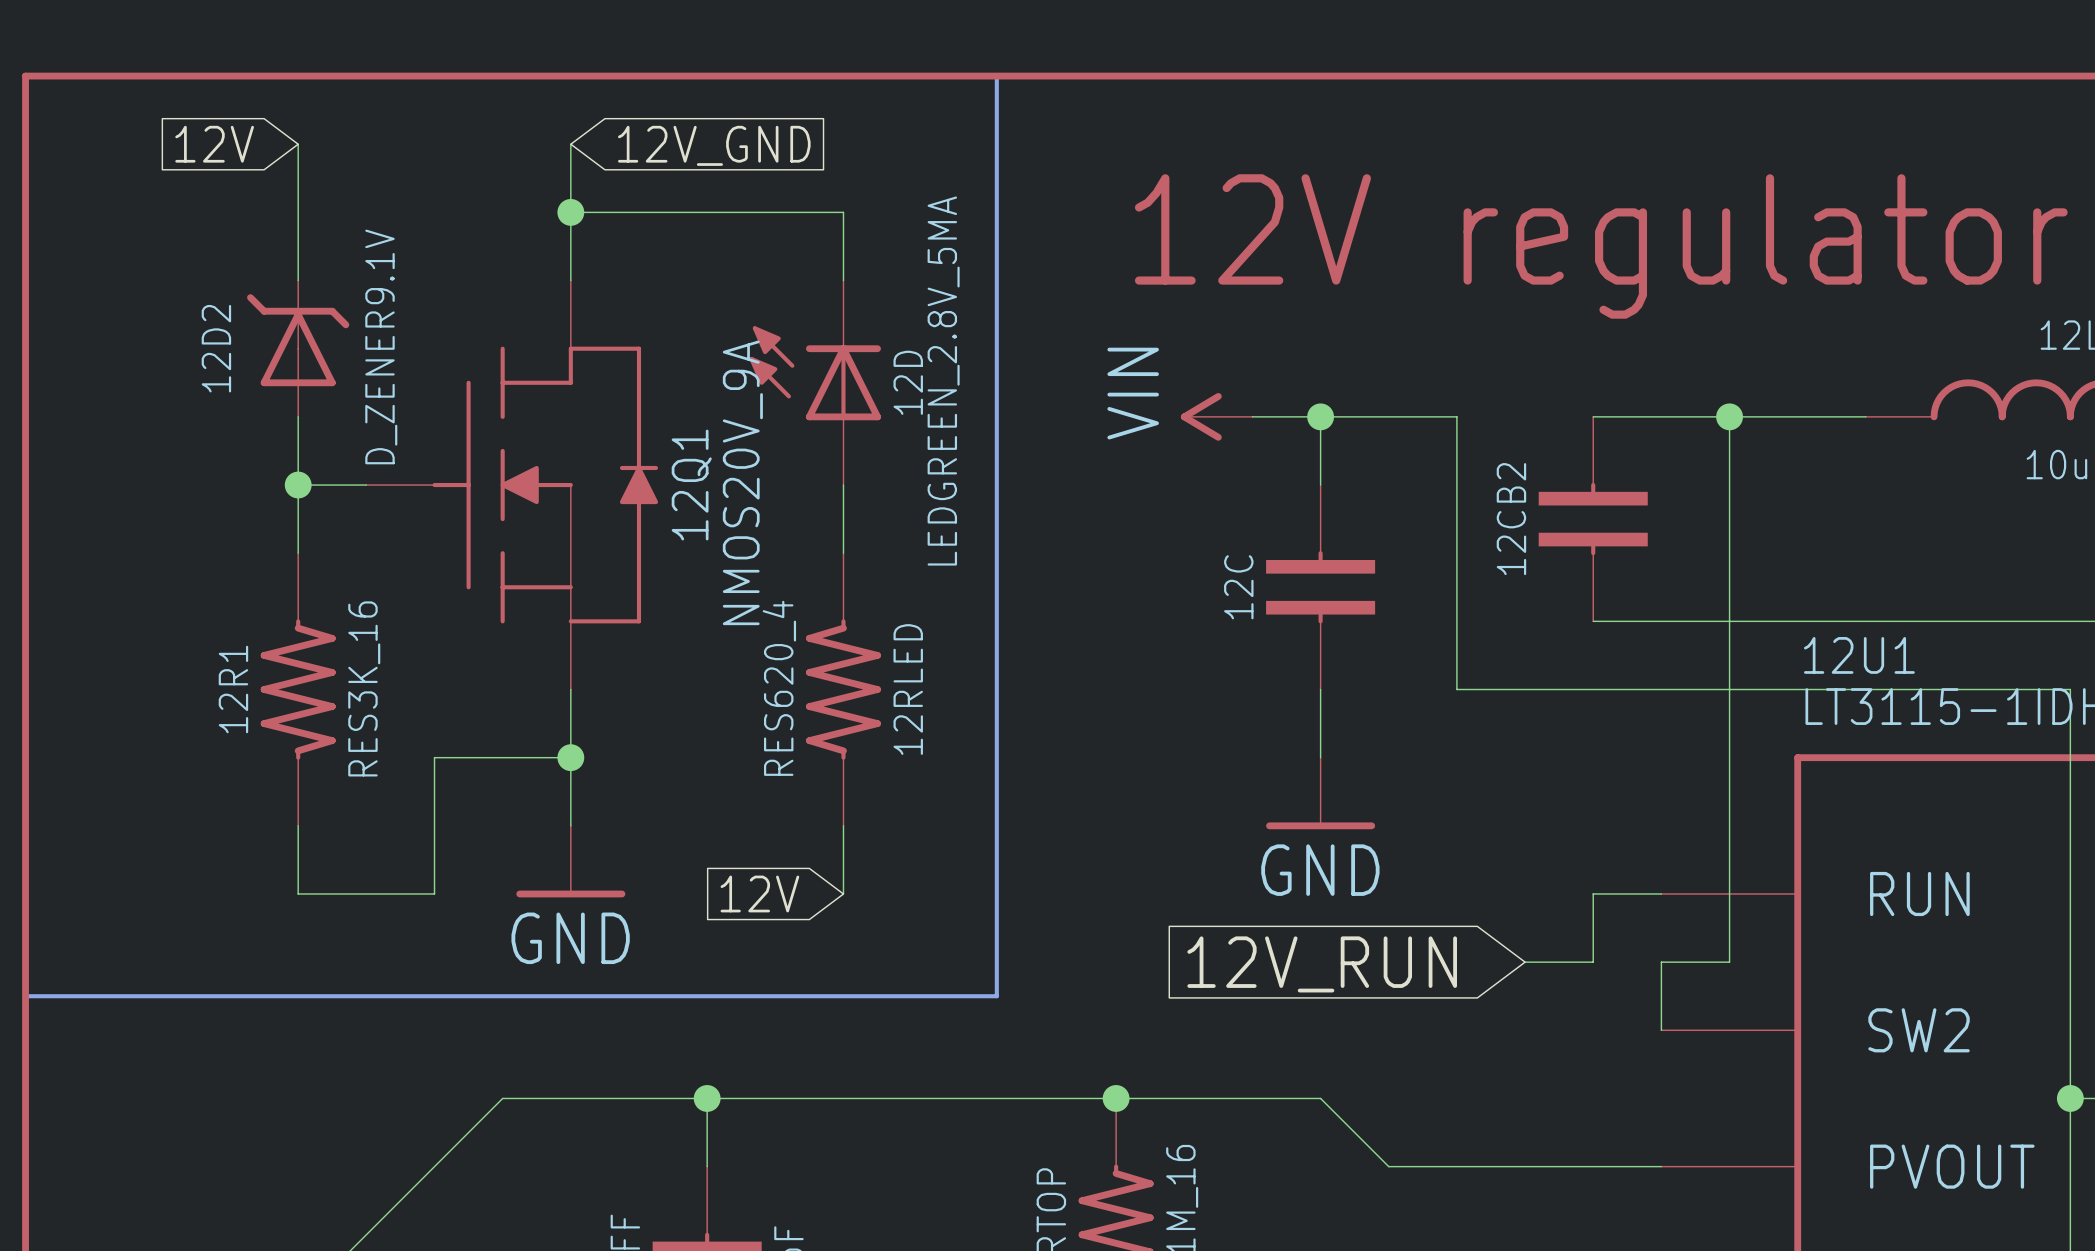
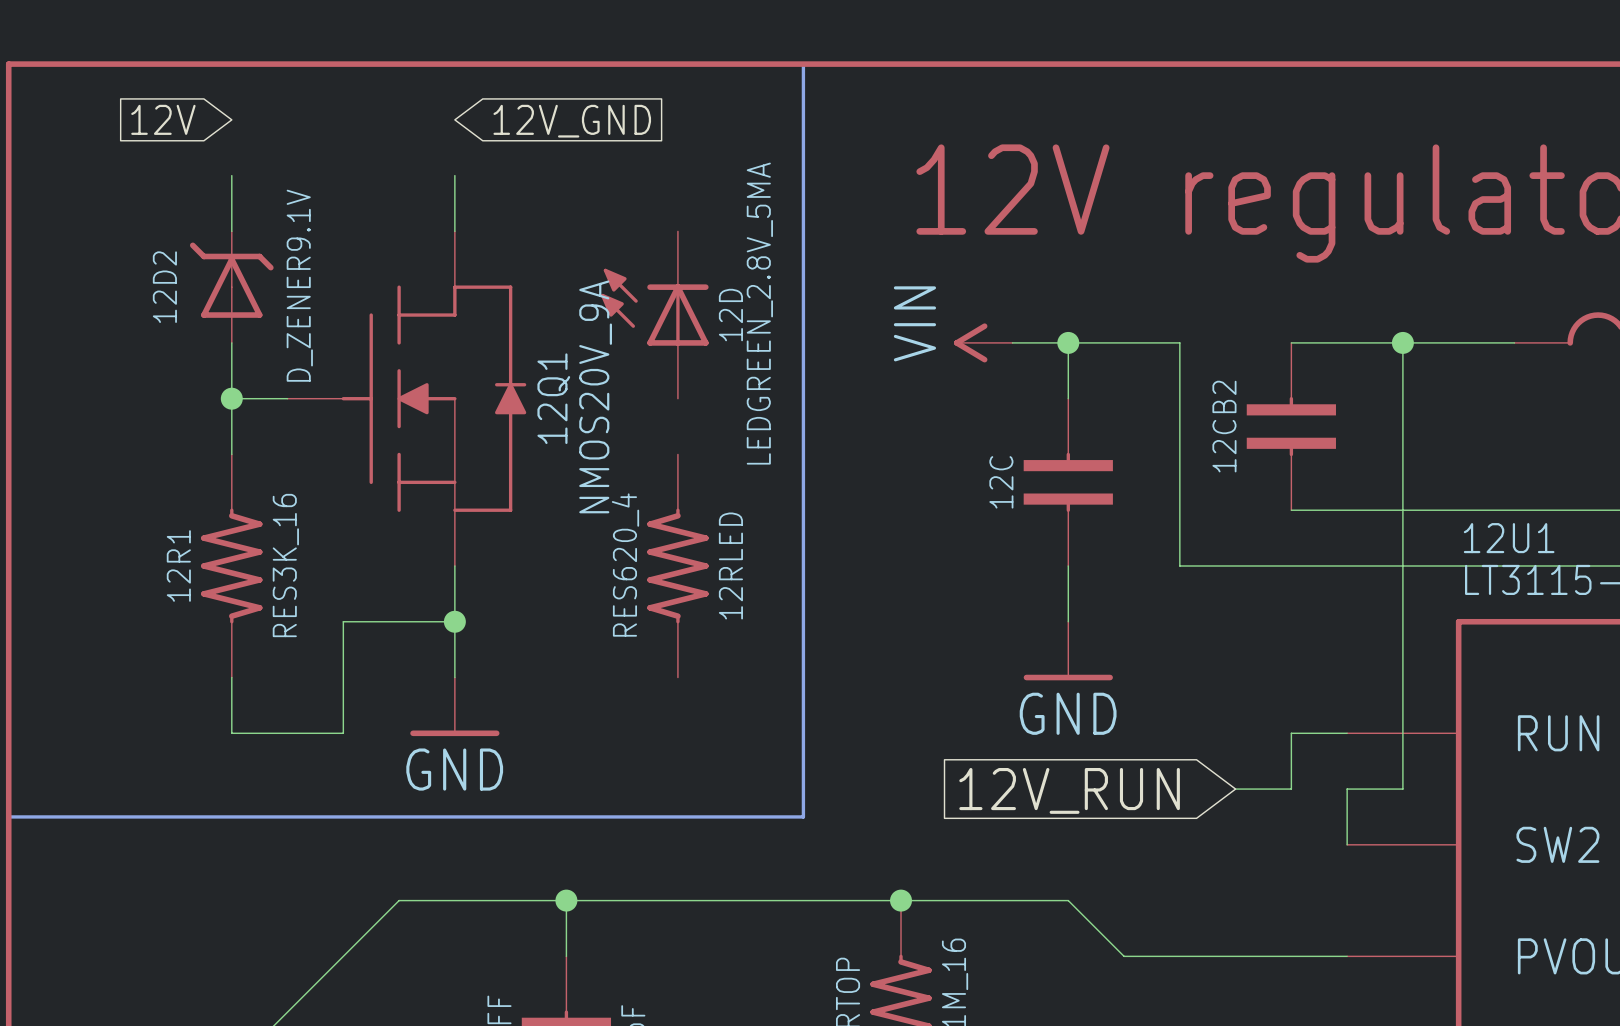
wire: (298, 144) (298, 212) -> none
wire: (570, 144) (570, 212) (843, 212) (843, 280) -> none
junction: (570, 212) -> none
wire: (843, 485) (843, 553) -> none
wire: (843, 825) (843, 893) -> none
global label: 12V (759, 893) -> none

